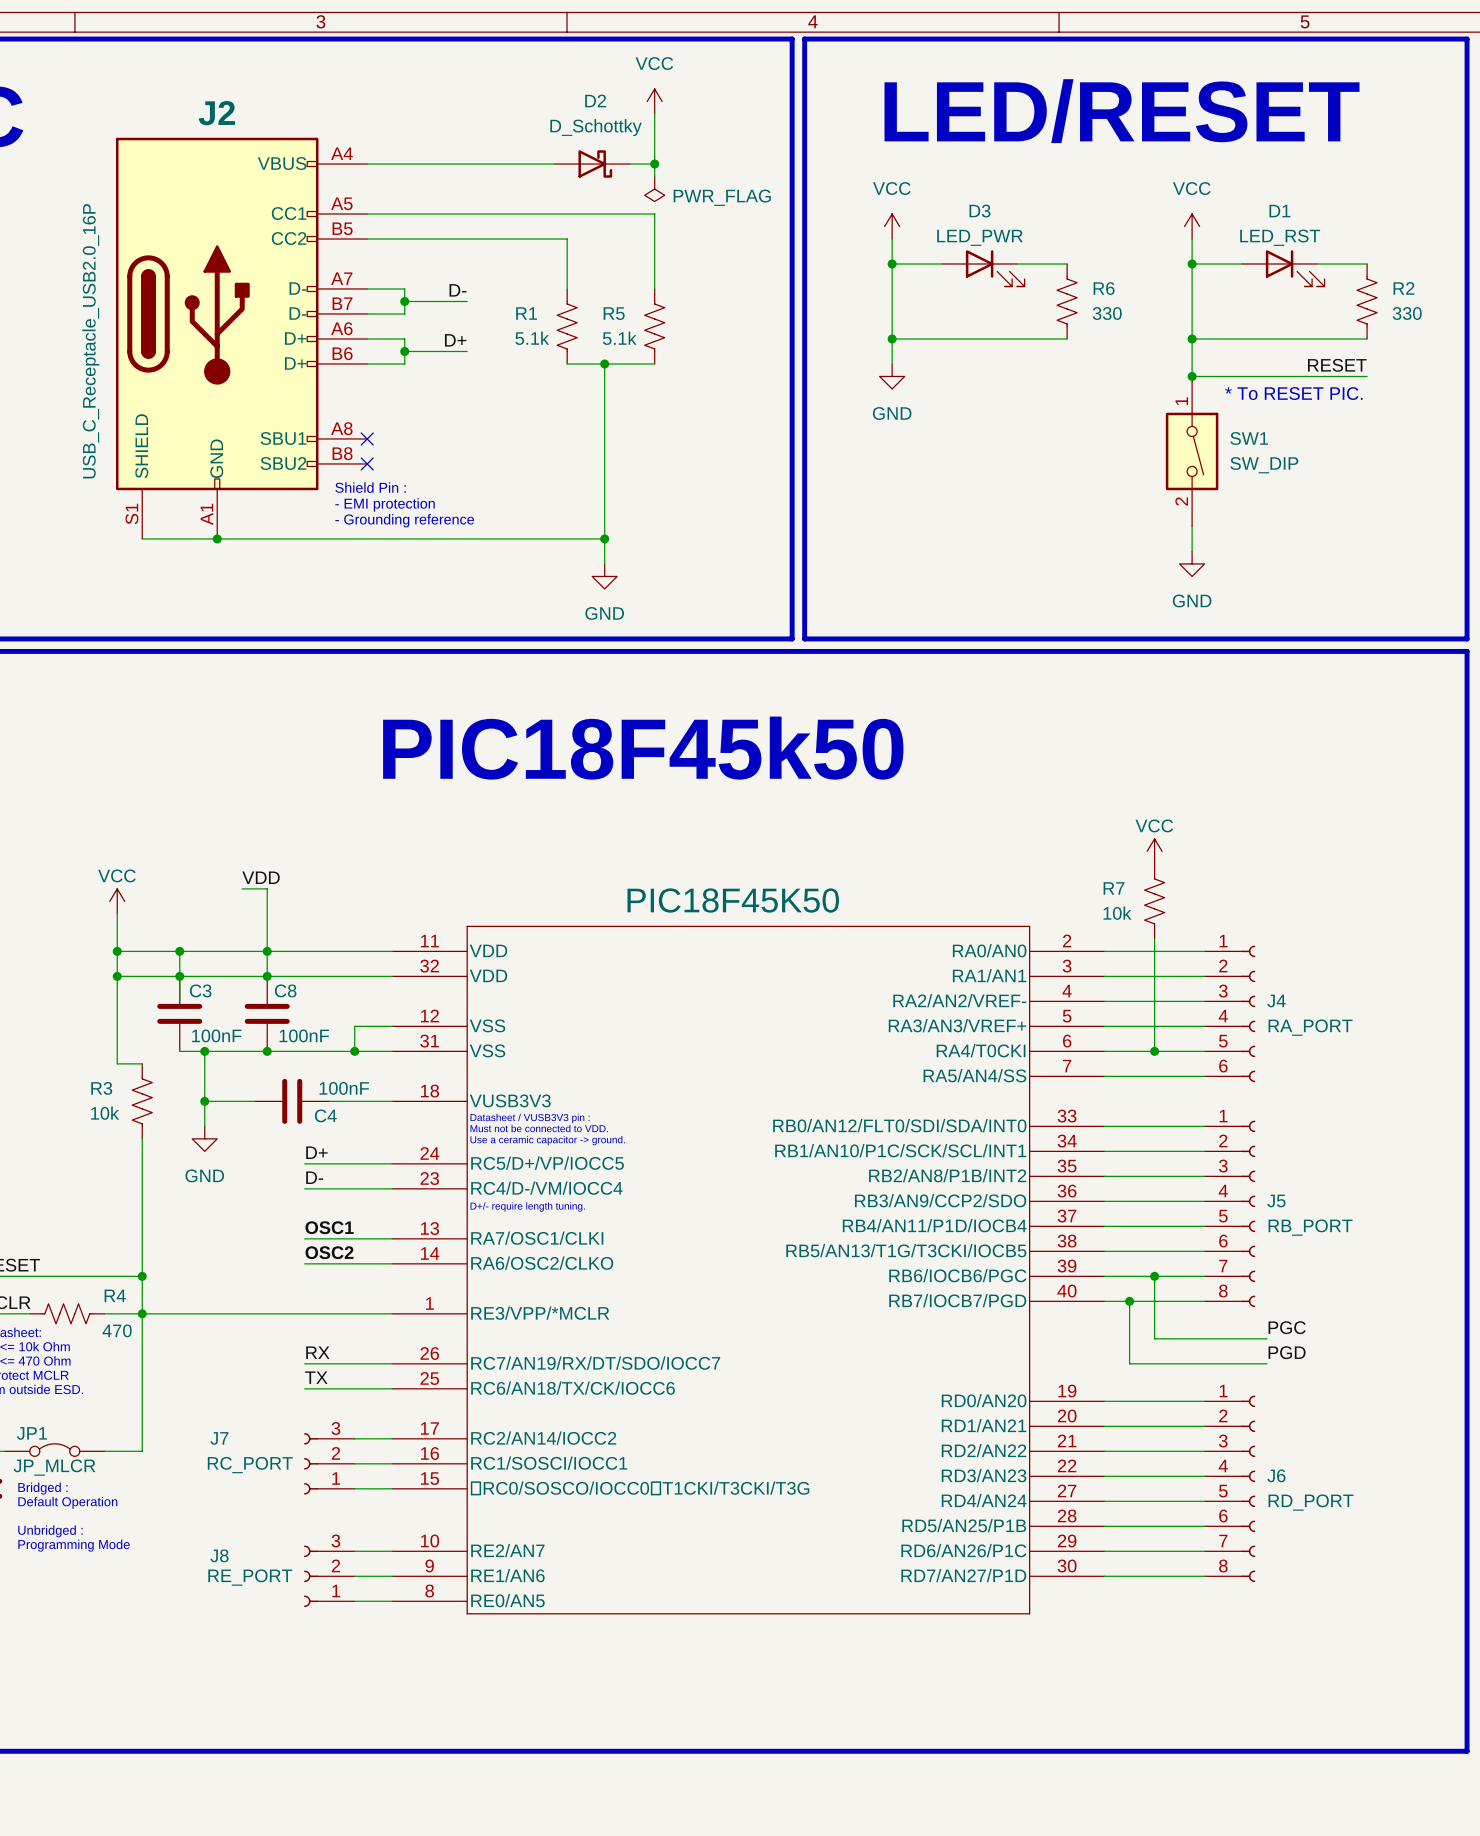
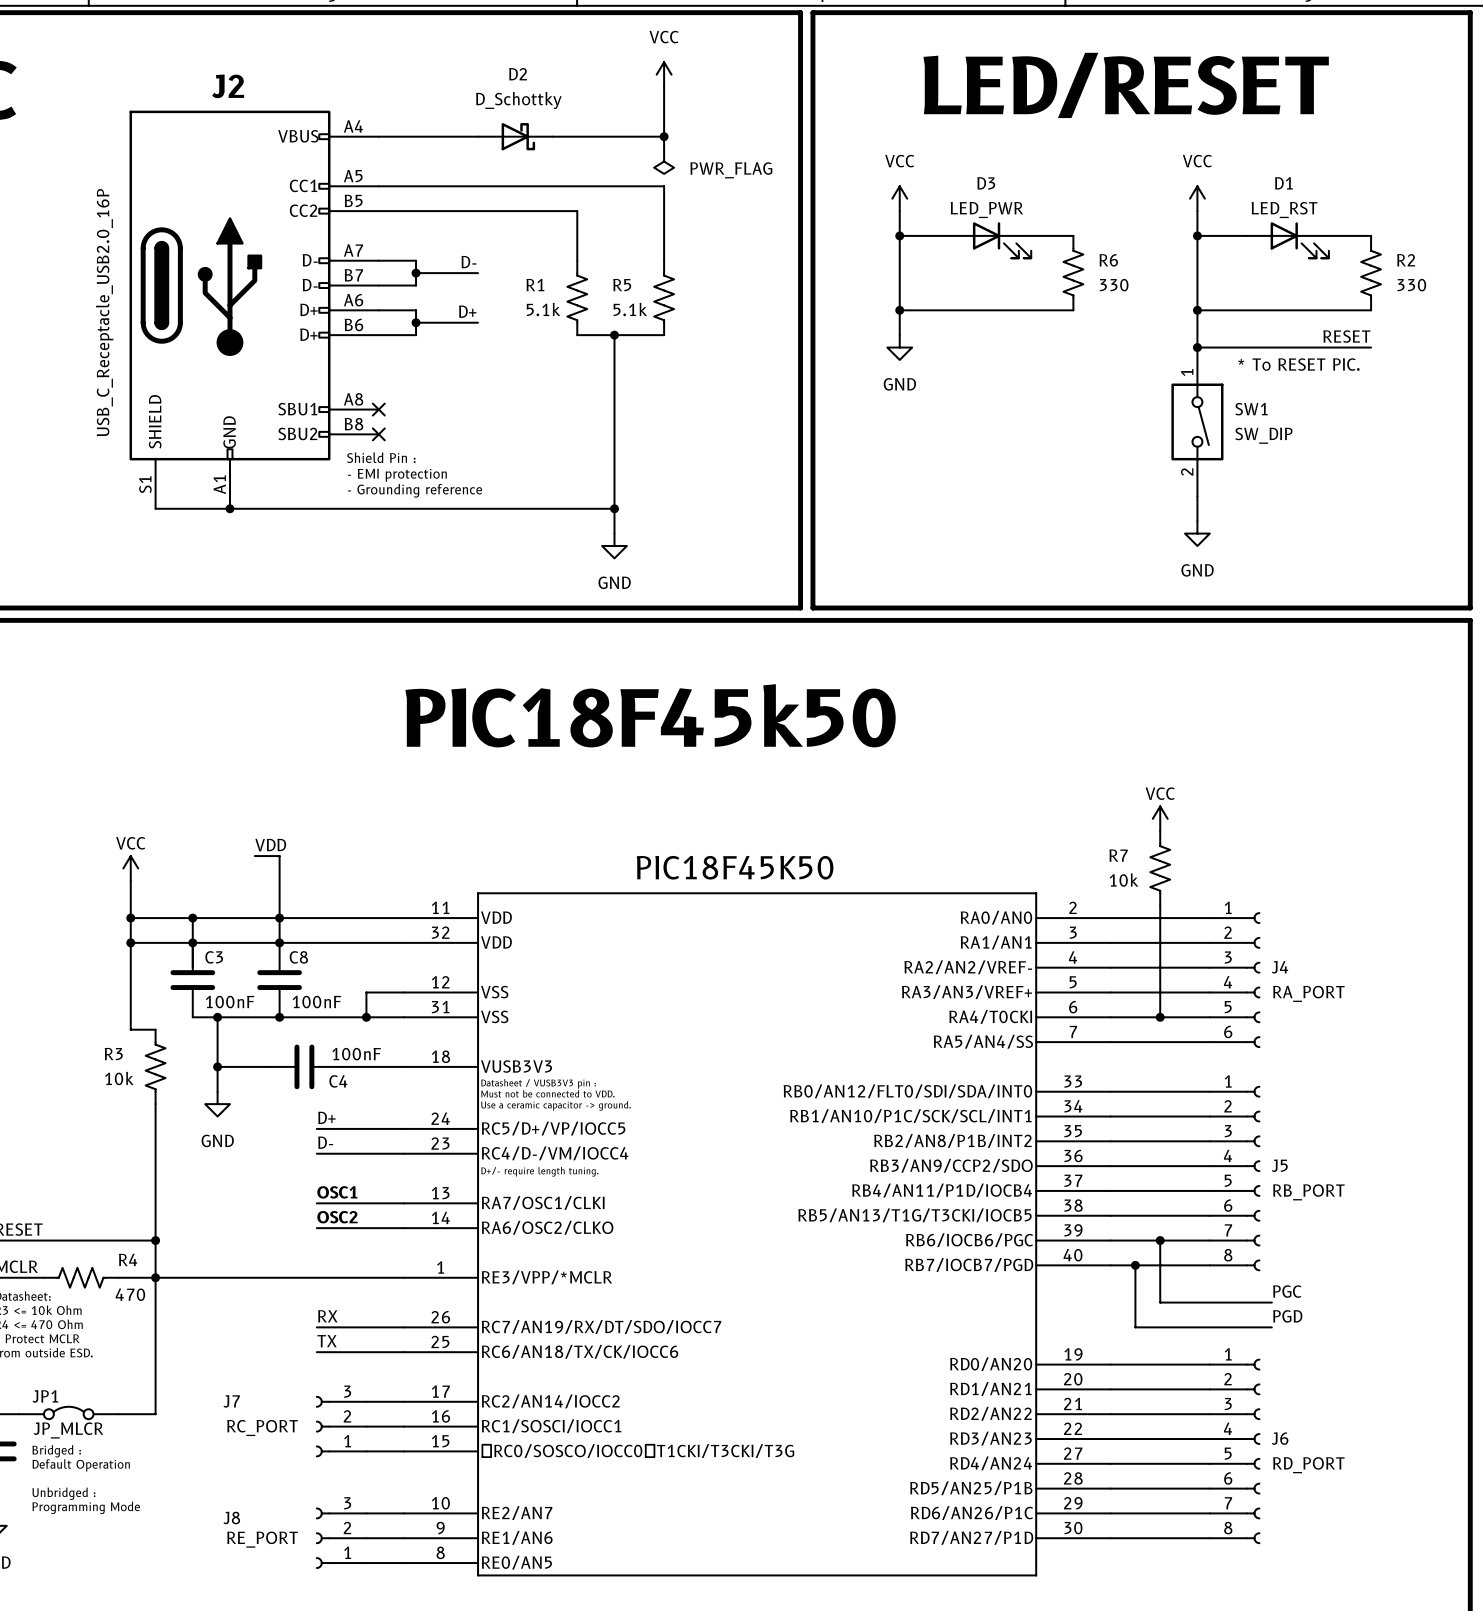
D2 position: (592, 164) -> (515, 136)

